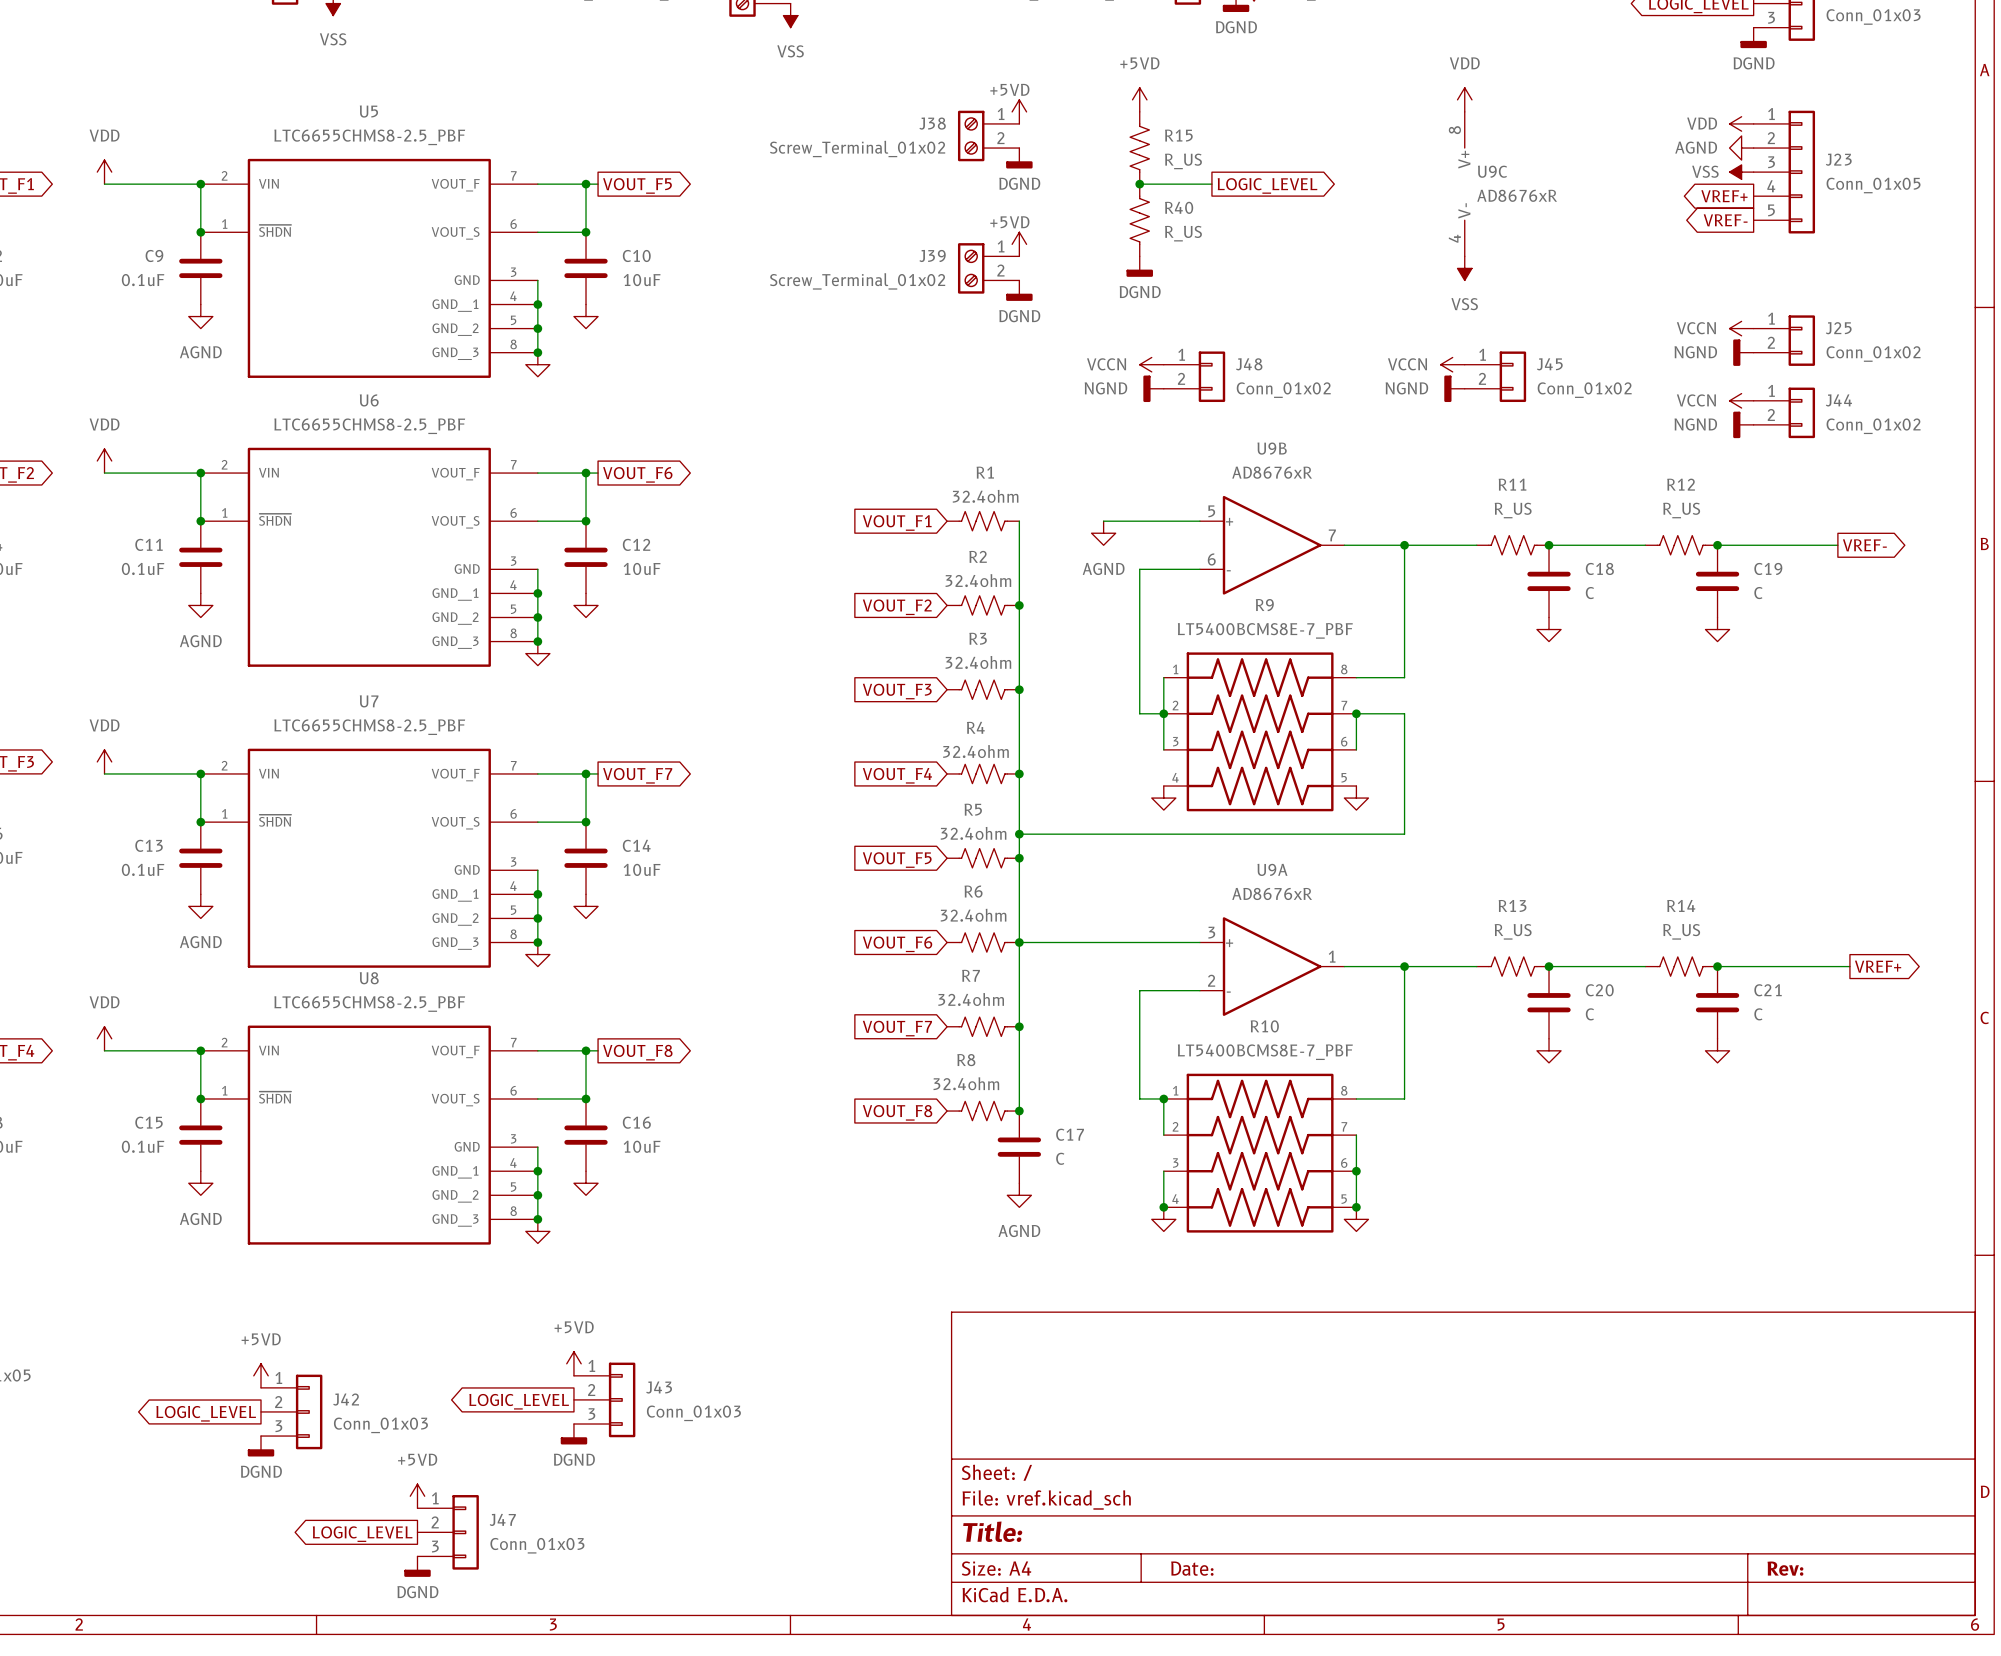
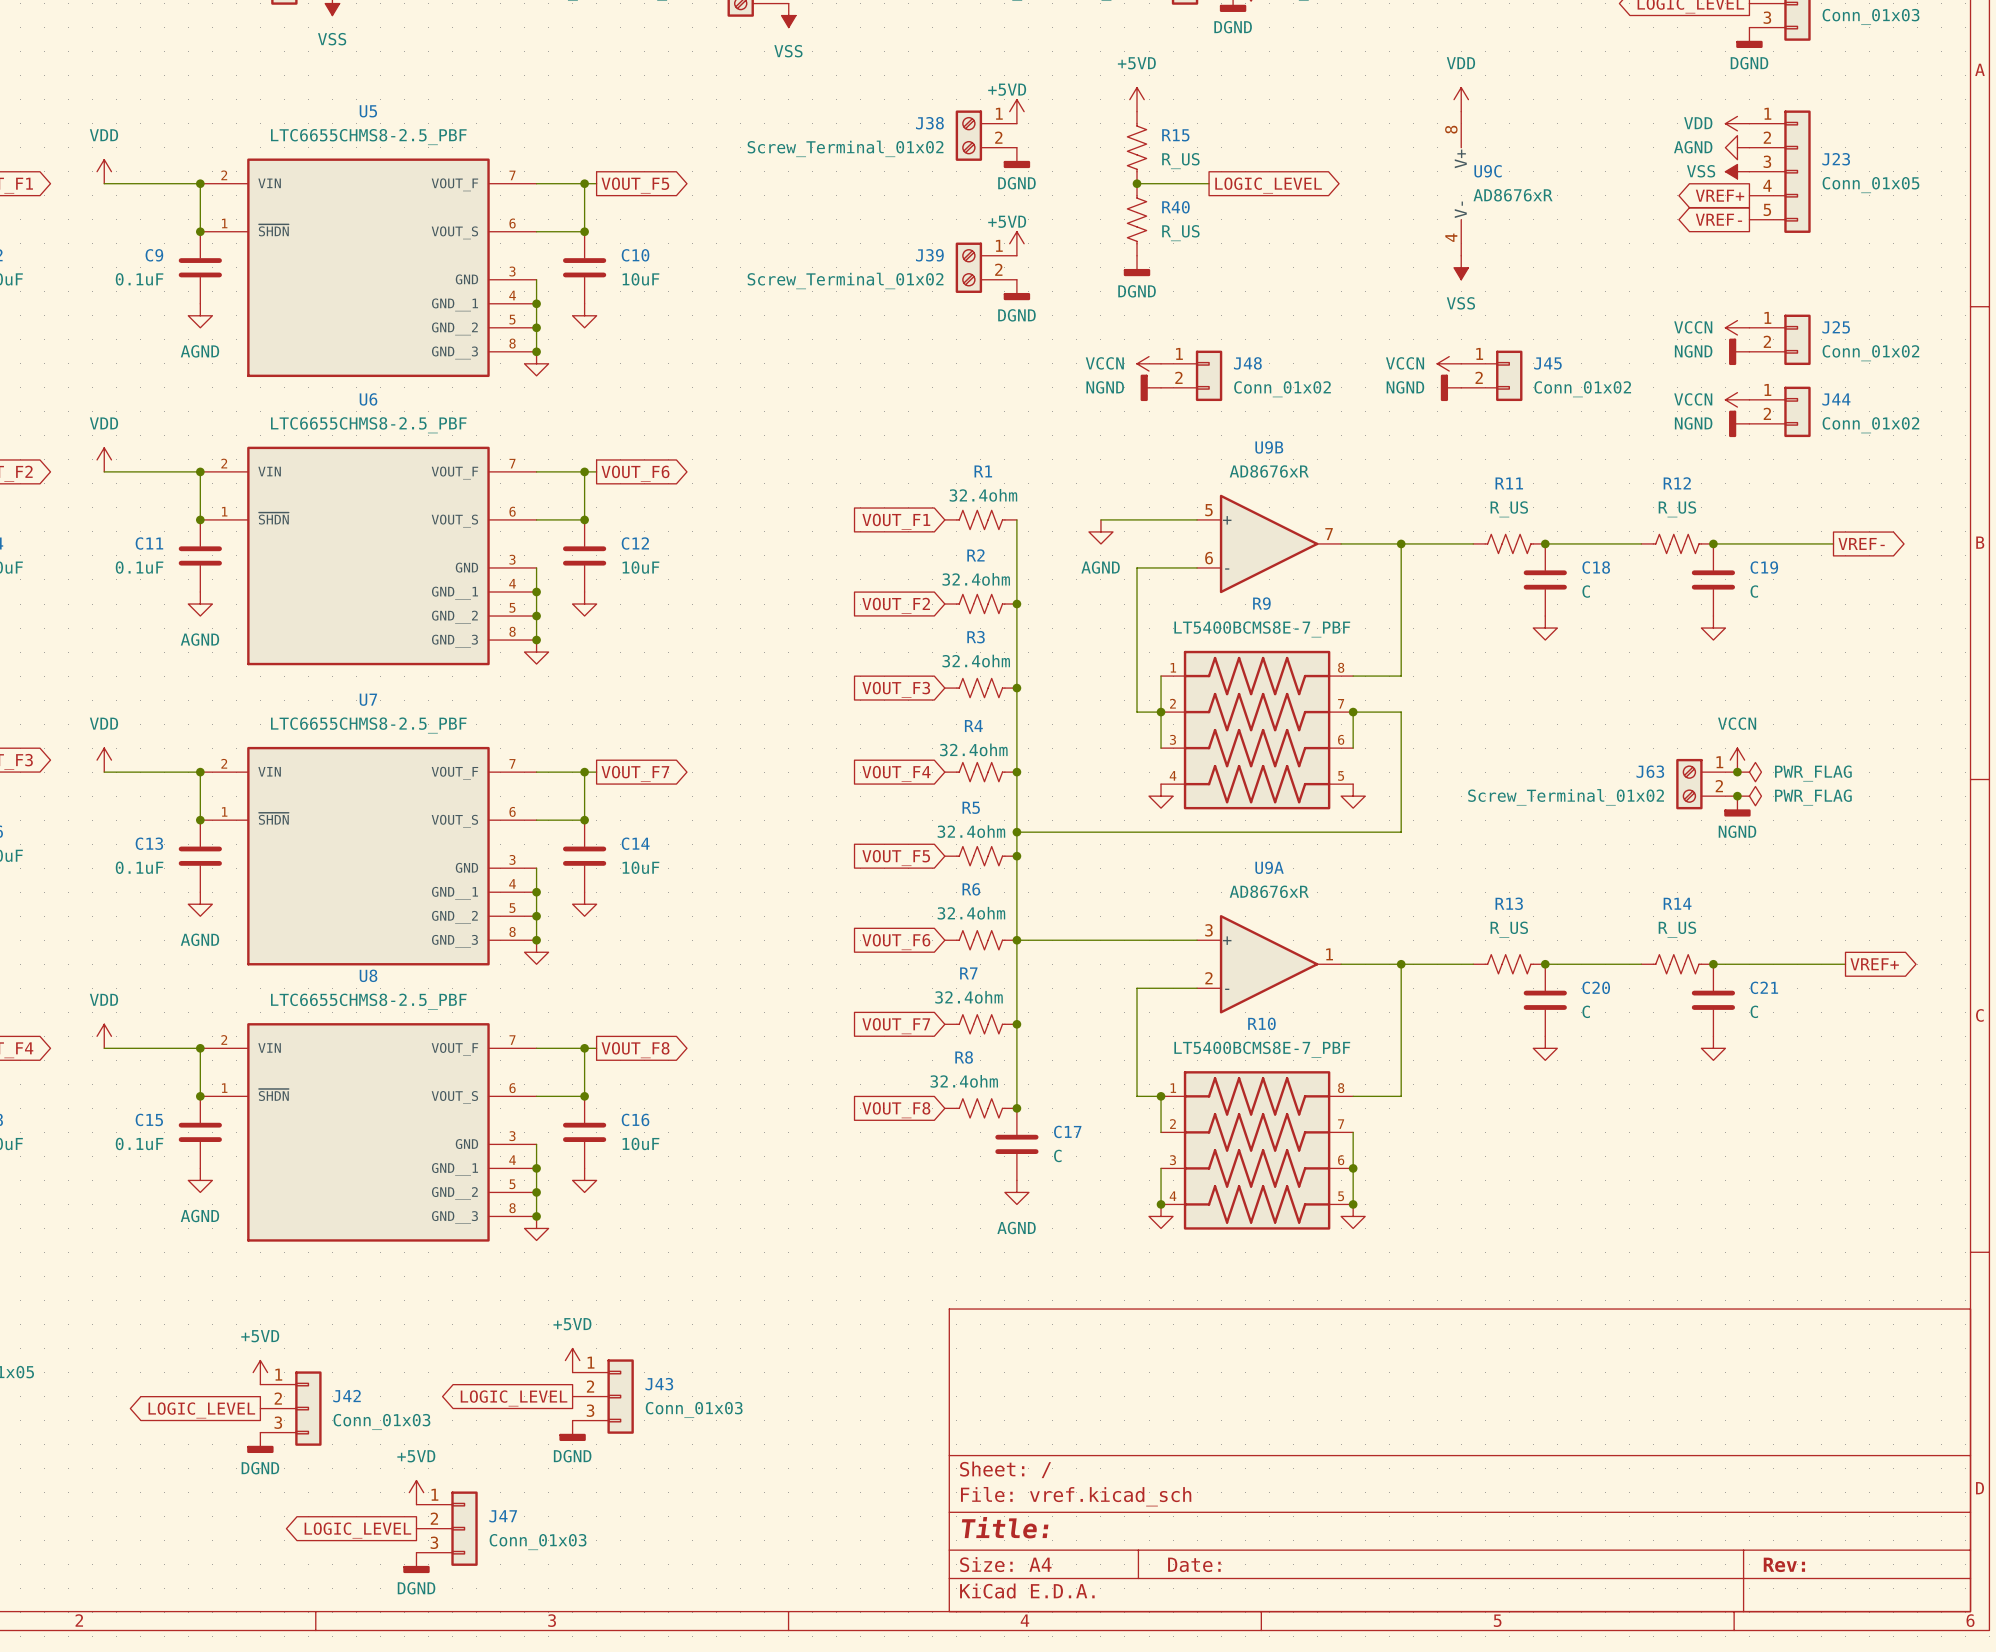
power symbol: none -> VCCN (1737, 760)
junction: none -> (1737, 772)
power symbol: none -> PWR_FLAG (1749, 772)
J63: none -> Screw_Terminal_01x02 (1706, 784)
junction: none -> (1737, 796)
power symbol: none -> PWR_FLAG (1749, 796)
power symbol: none -> NGND (1737, 806)

